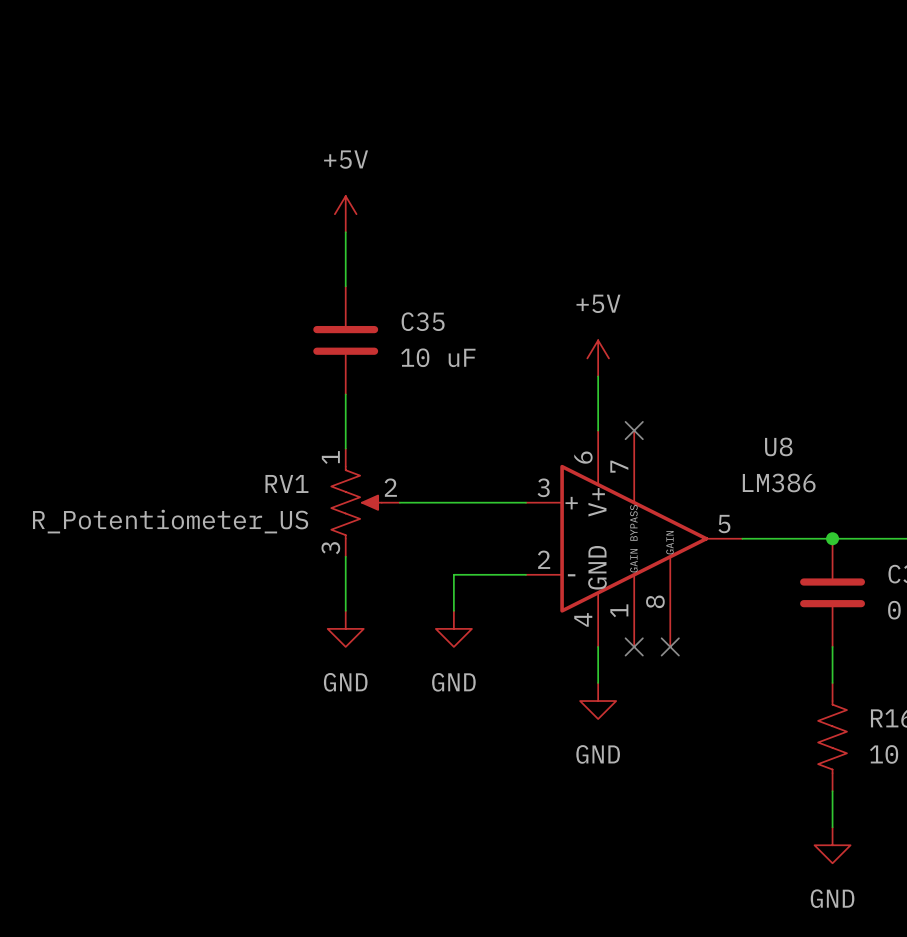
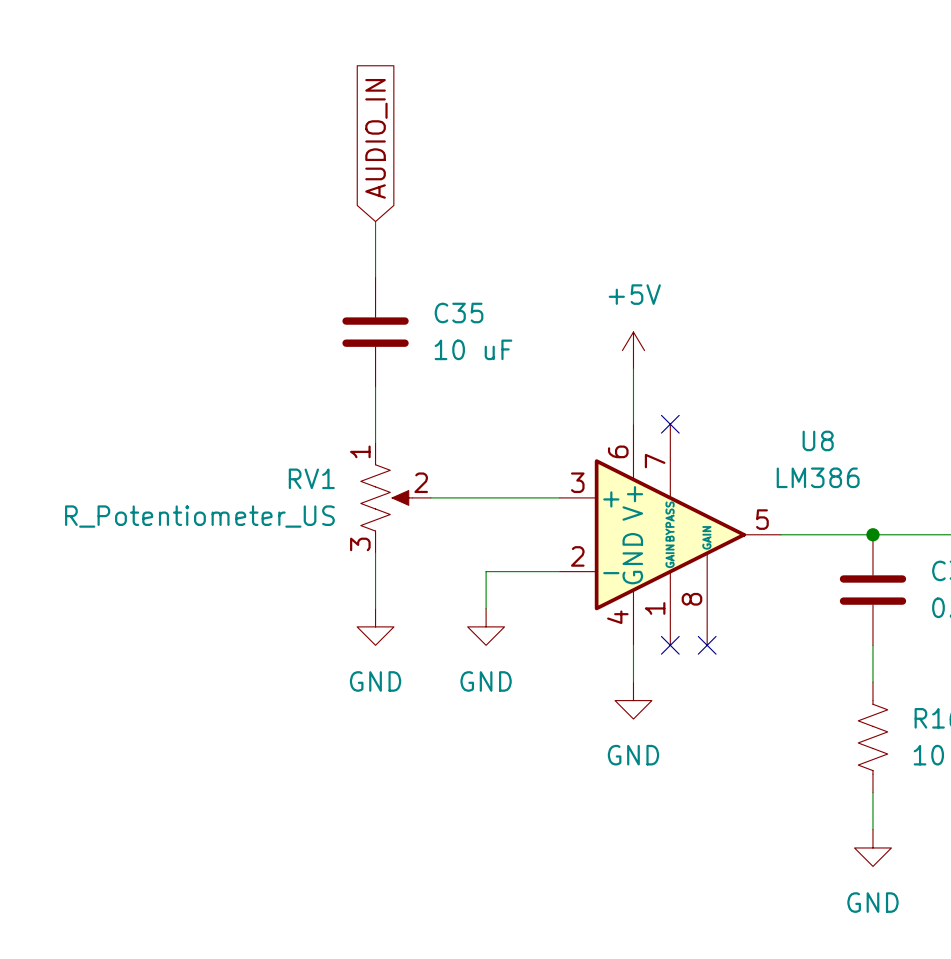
global label: none -> AUDIO_IN (376, 138)
power symbol: +5V (345, 214) -> none

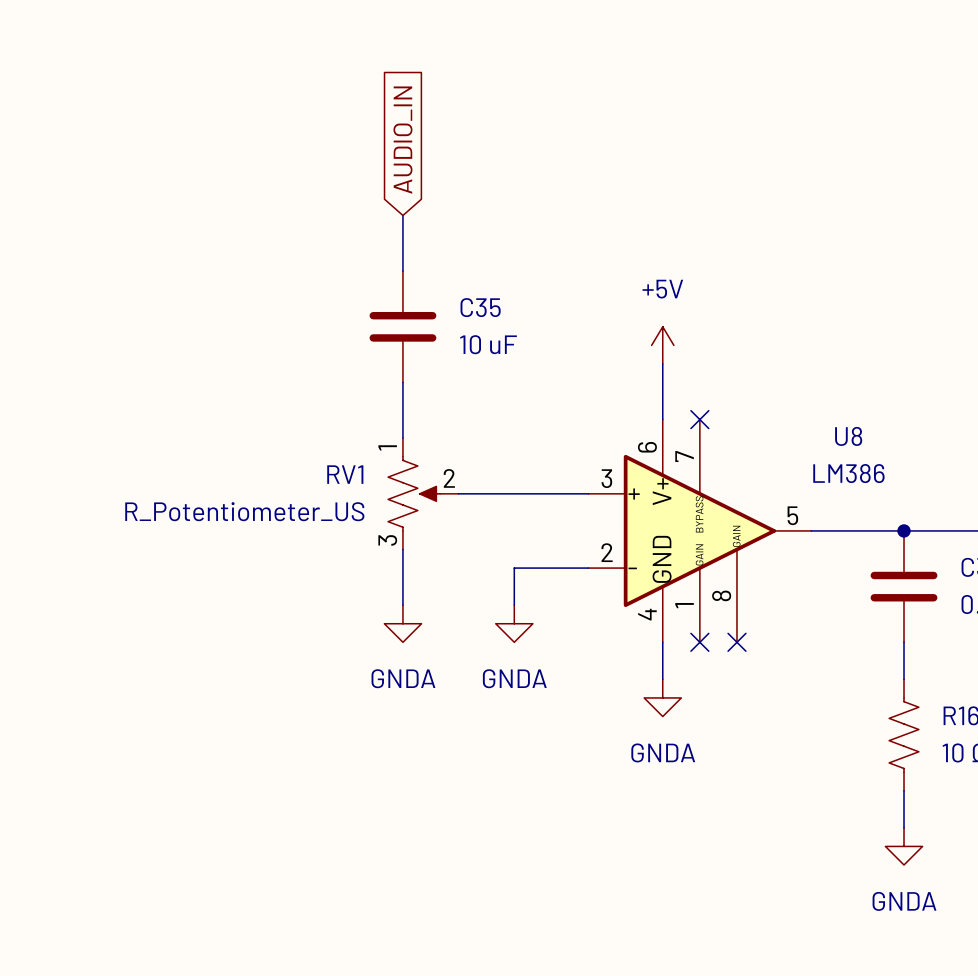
power symbol: GND (375, 626) -> GNDA (402, 623)
power symbol: GND (486, 626) -> GNDA (514, 623)
power symbol: GND (633, 700) -> GNDA (662, 697)
power symbol: GND (872, 847) -> GNDA (904, 846)

